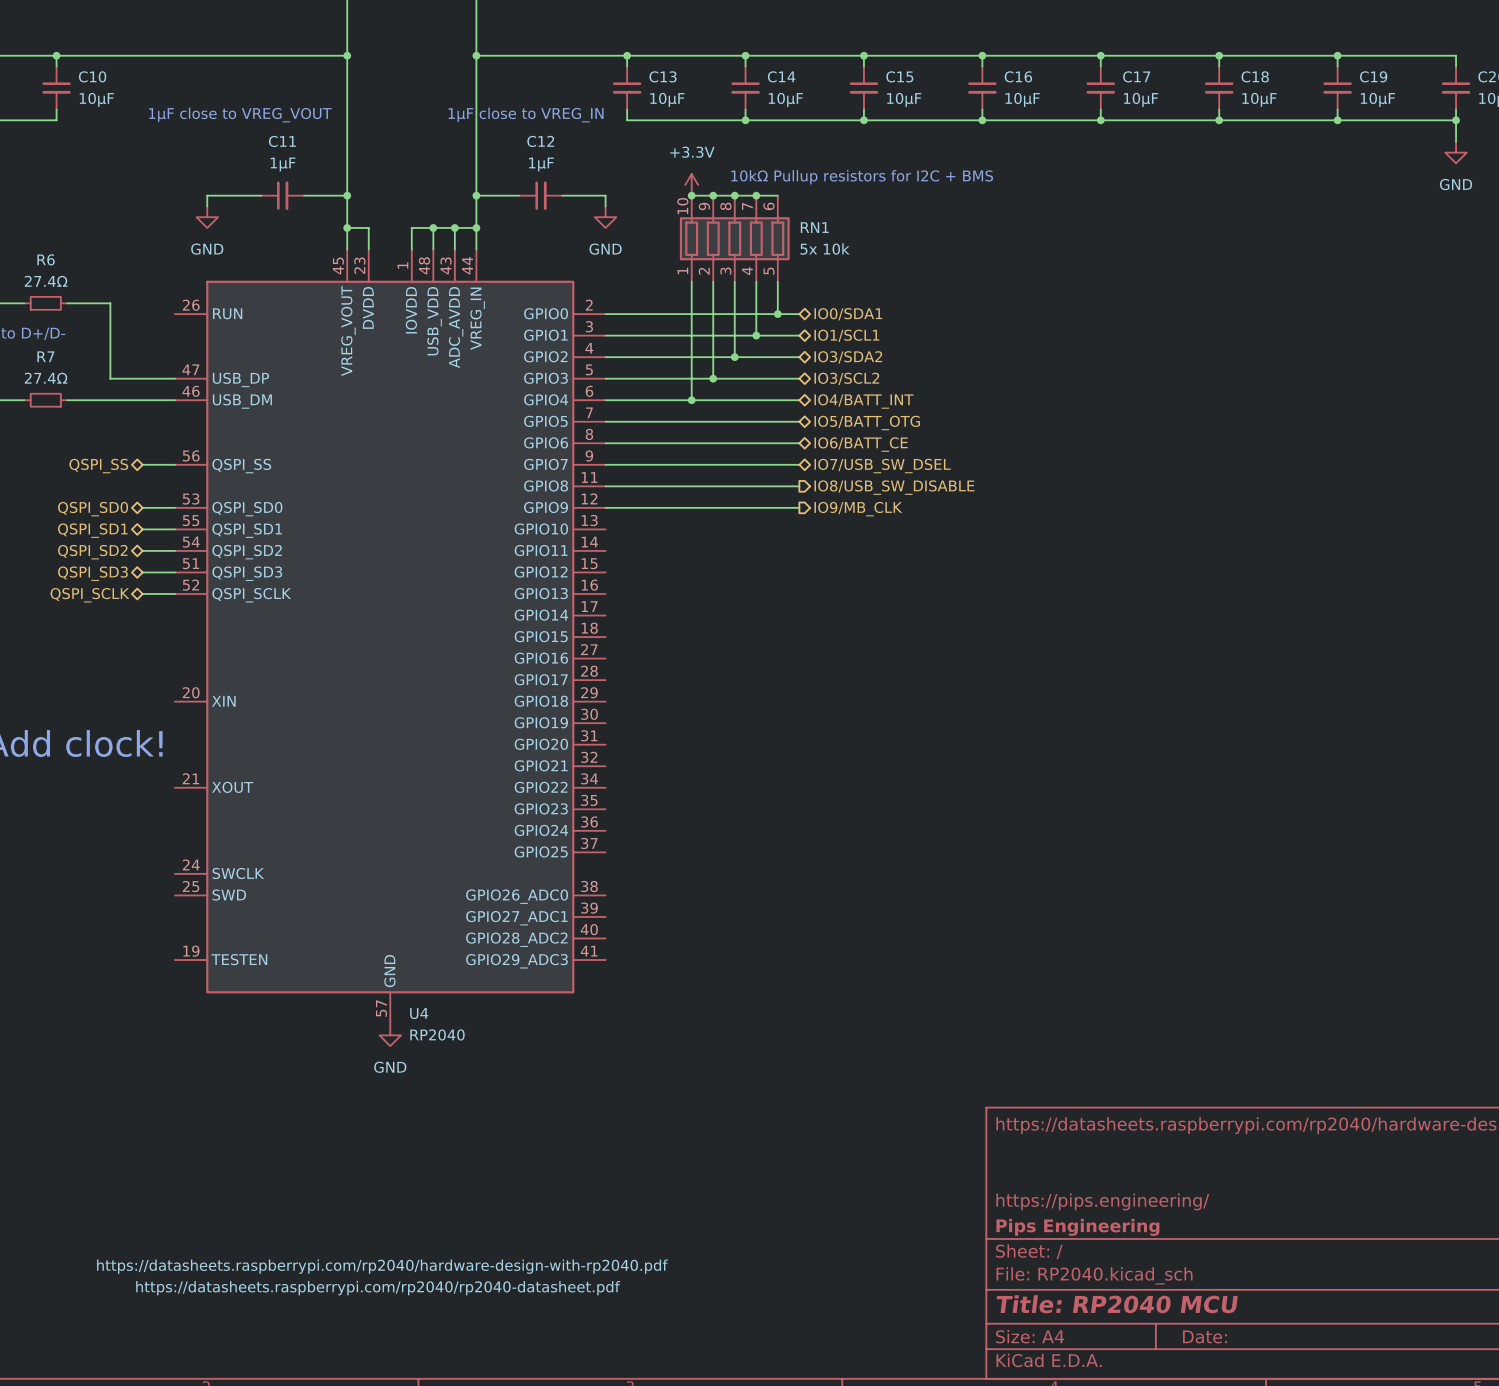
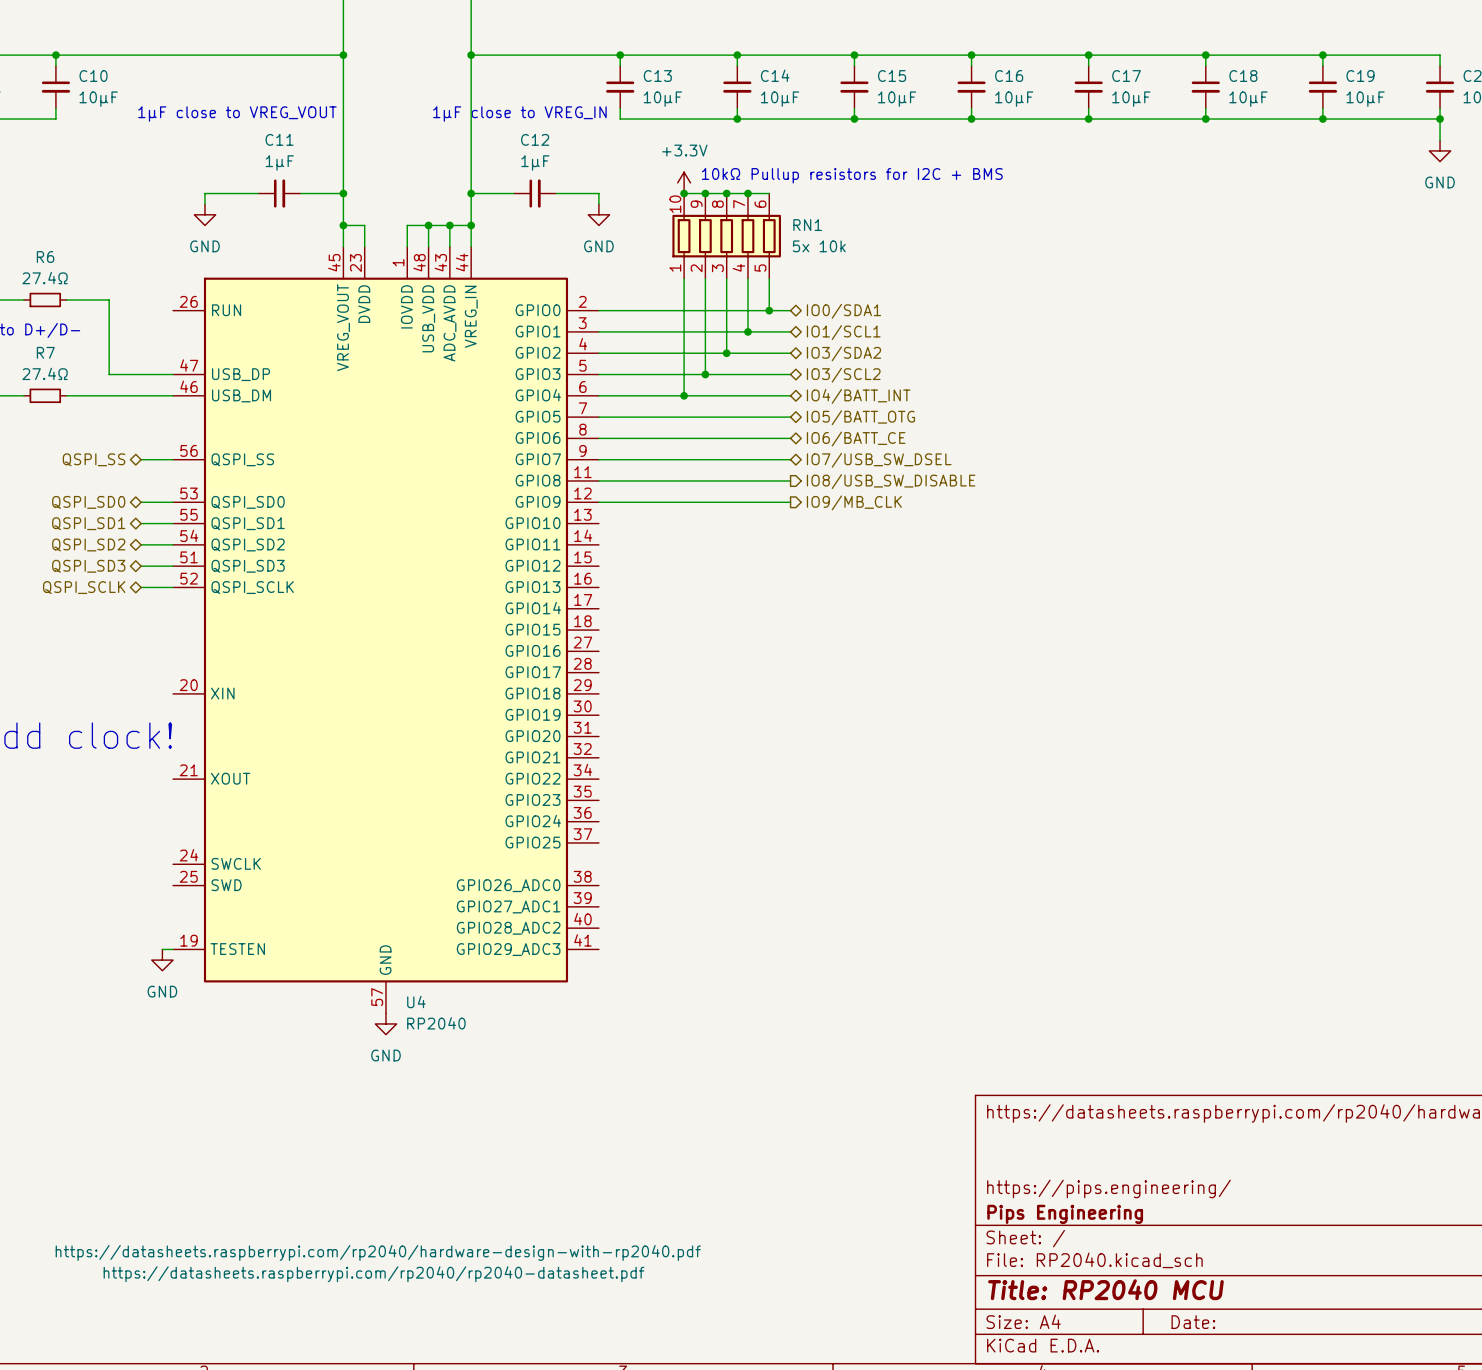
wire: none -> (162, 949) (173, 949)
power symbol: none -> GND (162, 960)

